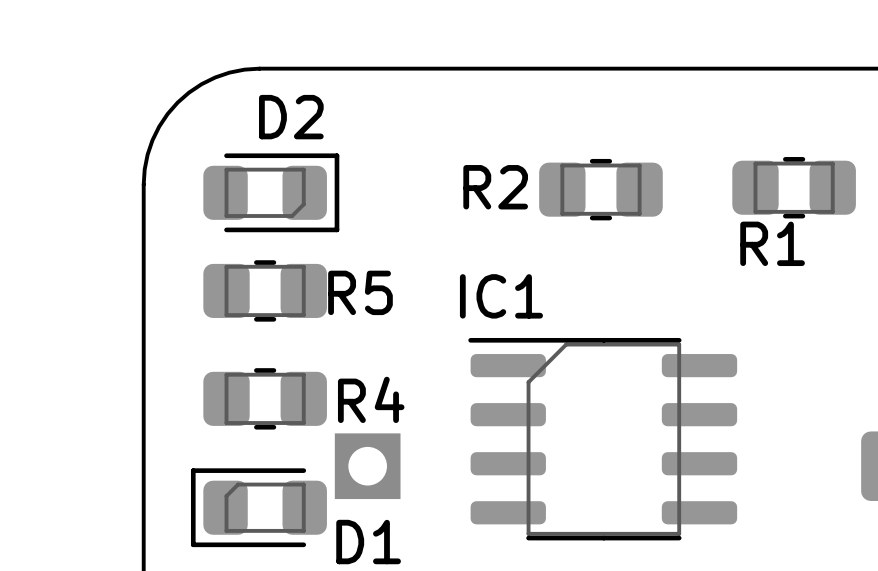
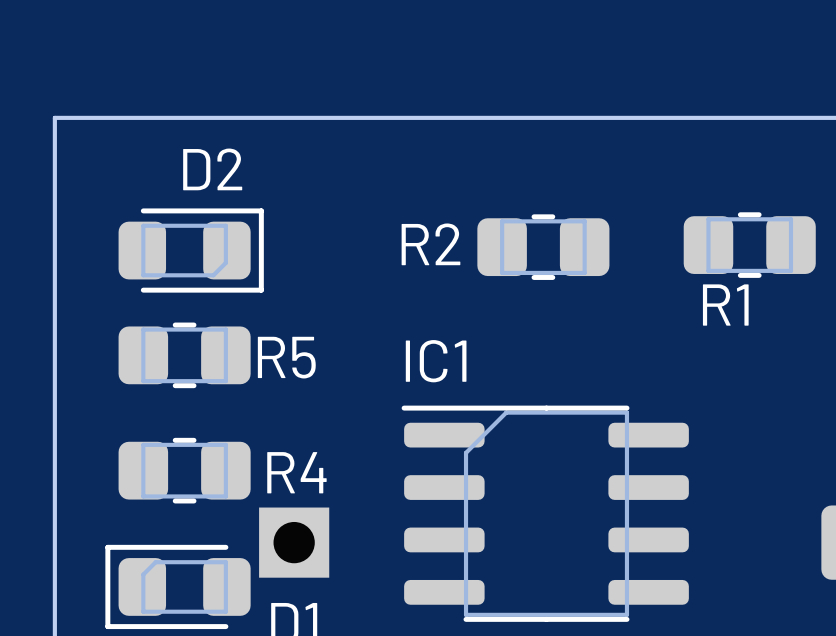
board edge: (259, 68) (229, 72) (215, 77) (189, 92) (177, 102) (159, 126) (152, 140) (144, 169) (143, 184) -> (178, 117) (54, 117) (54, 241)

